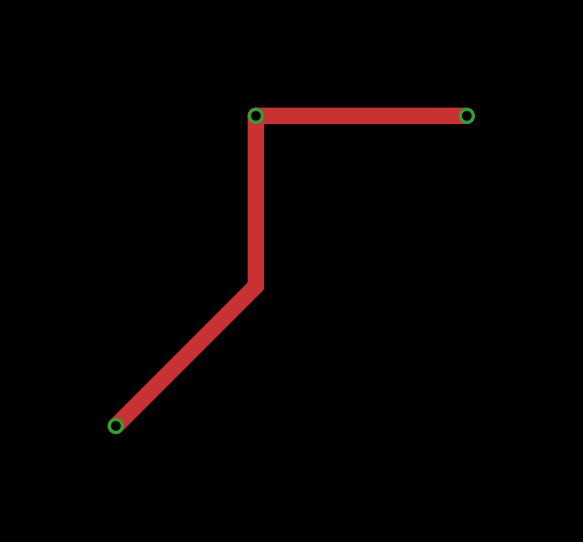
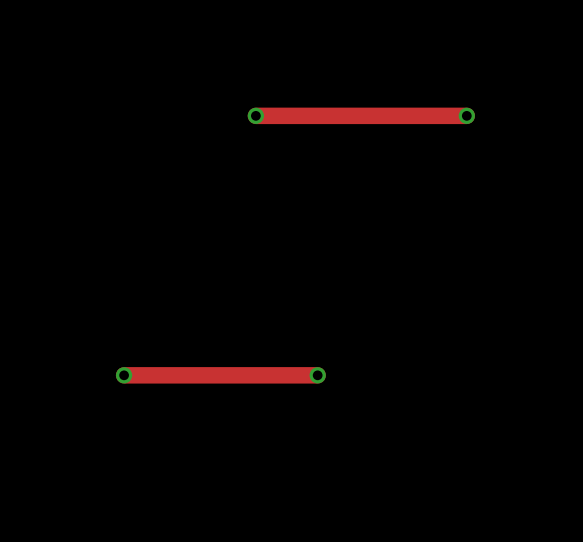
track: (255, 115) (255, 285) (115, 425) -> none
track: none -> (124, 375) (317, 375)
via: none -> (317, 375)
via position: (115, 425) -> (124, 375)

